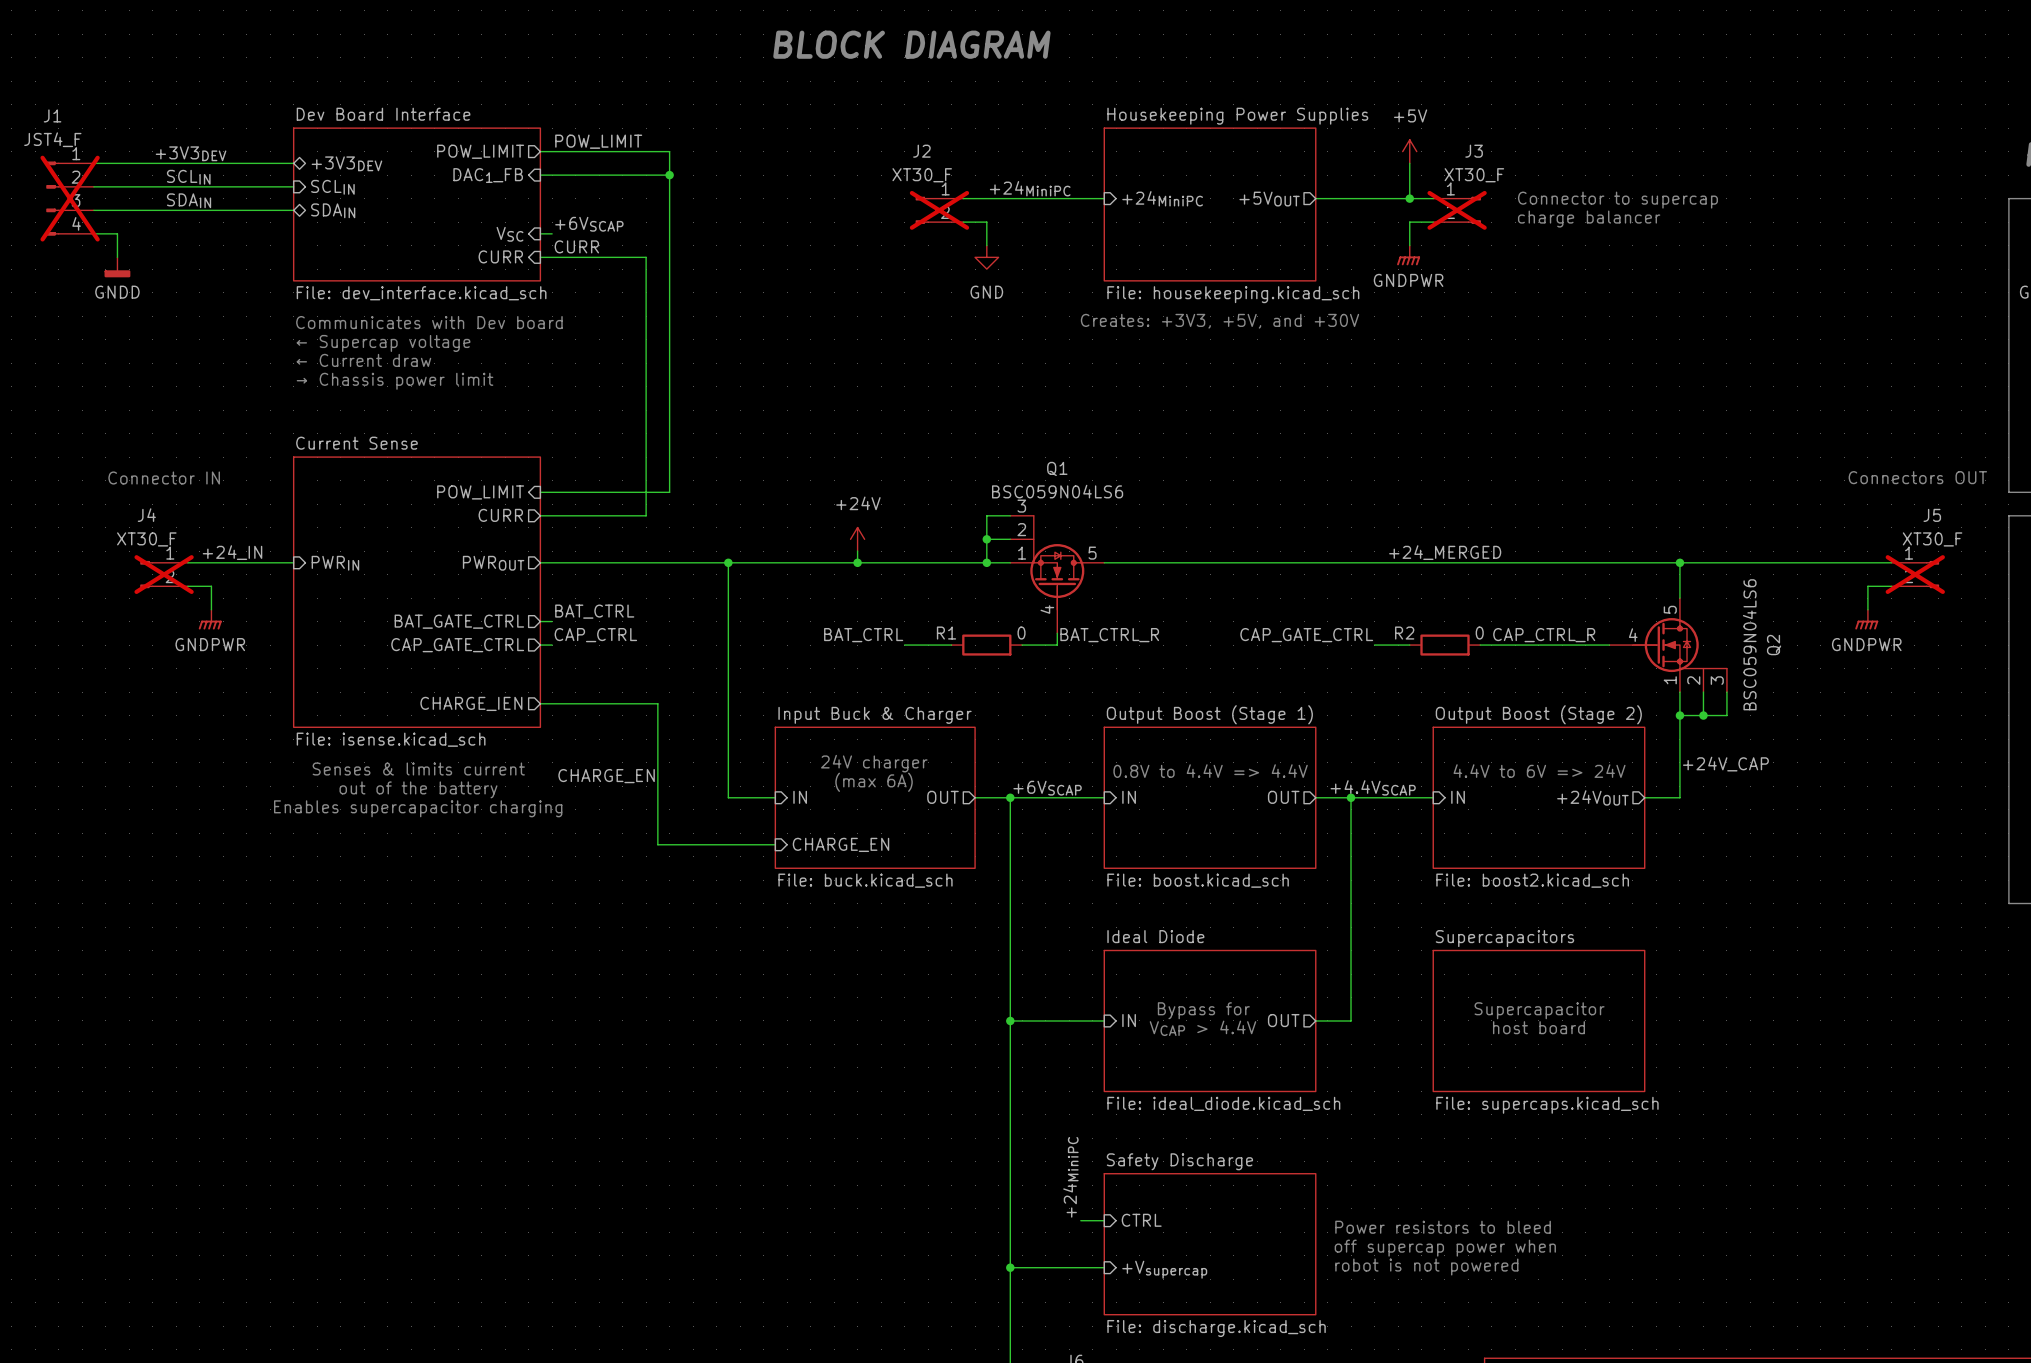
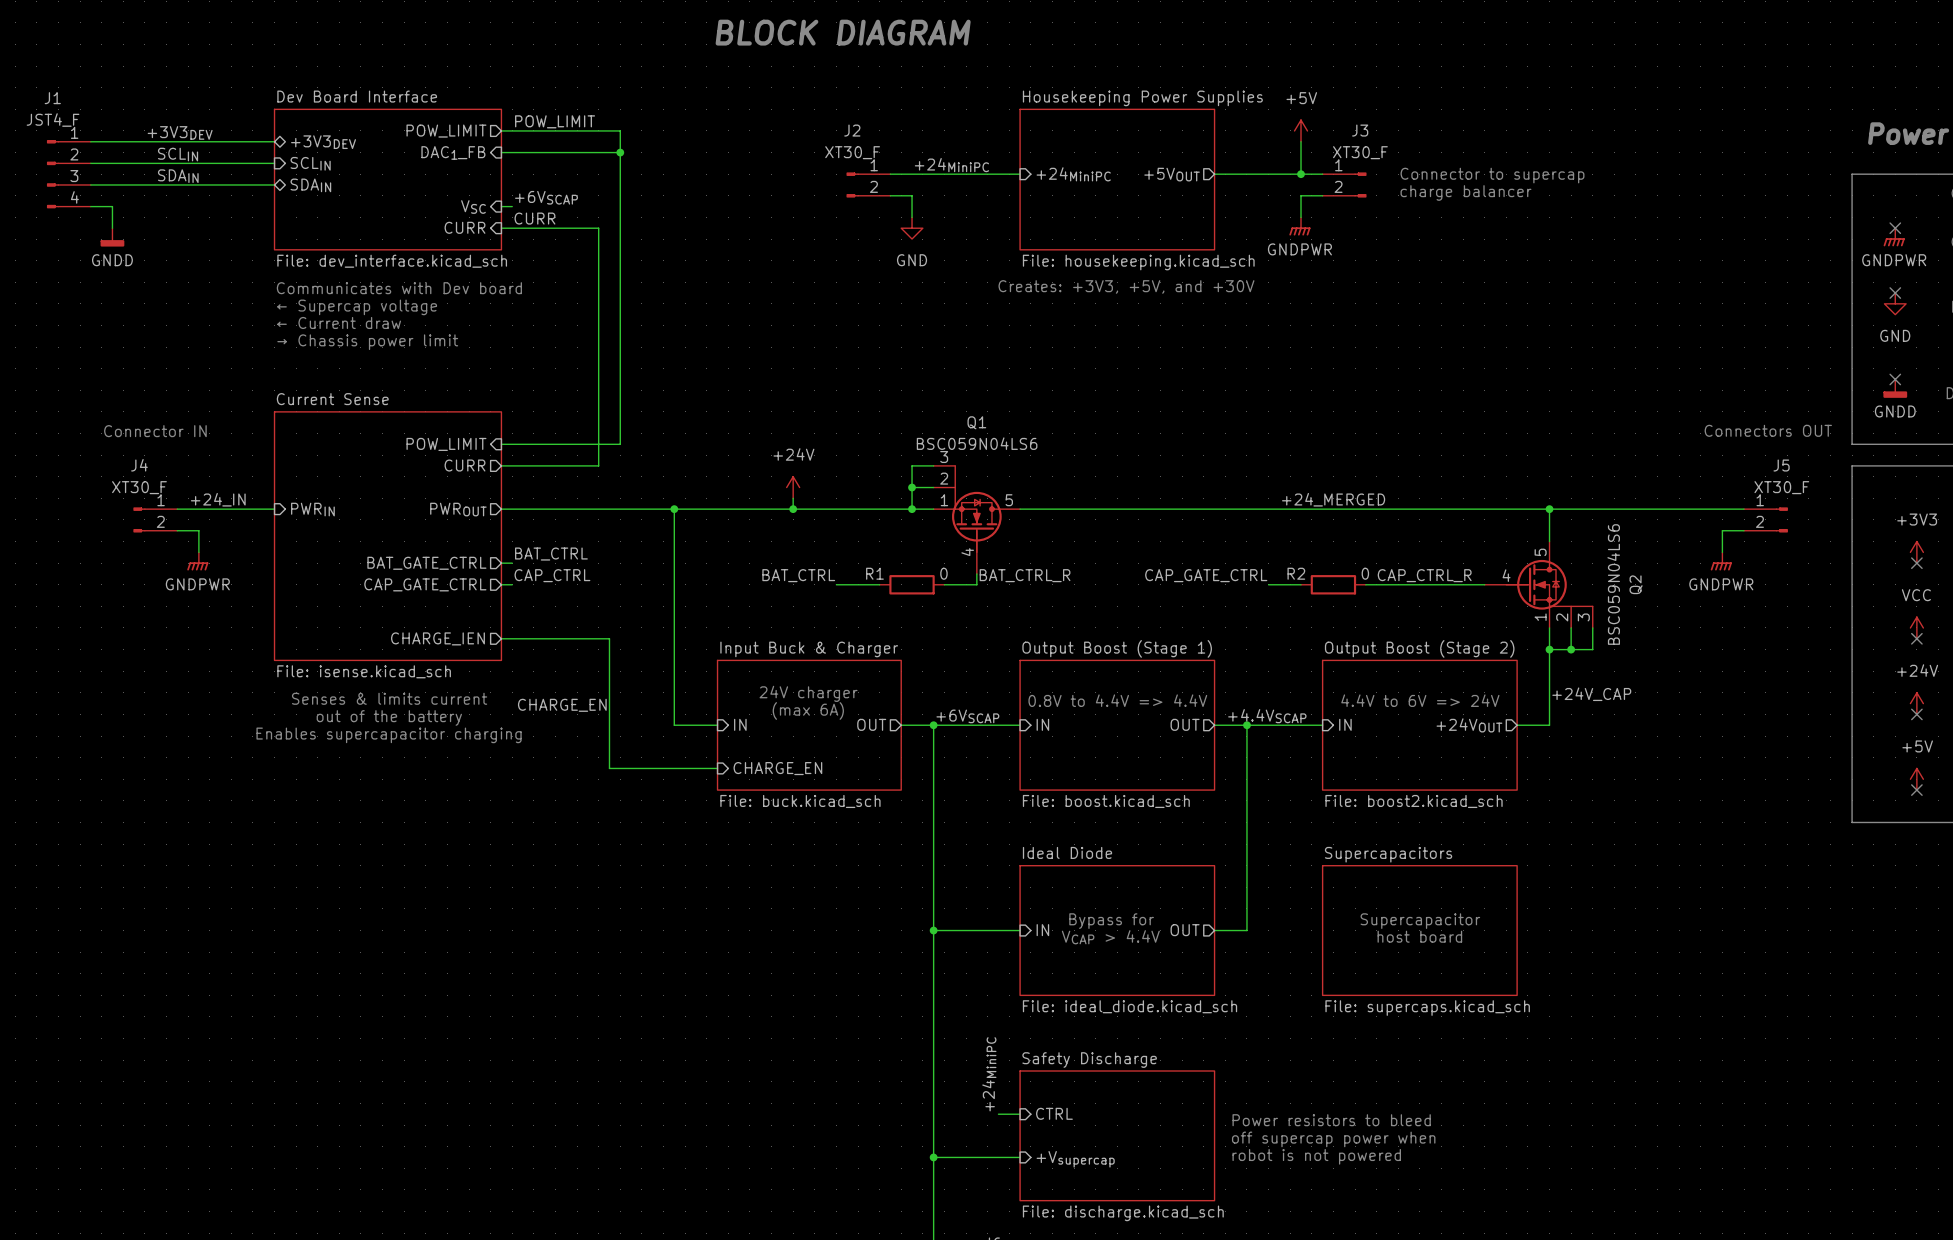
J1 do-not-place cross: (70, 198) -> none
J2 do-not-place cross: (939, 210) -> none
J3 do-not-place cross: (1457, 210) -> none
J4 do-not-place cross: (164, 574) -> none
J5 do-not-place cross: (1915, 574) -> none

